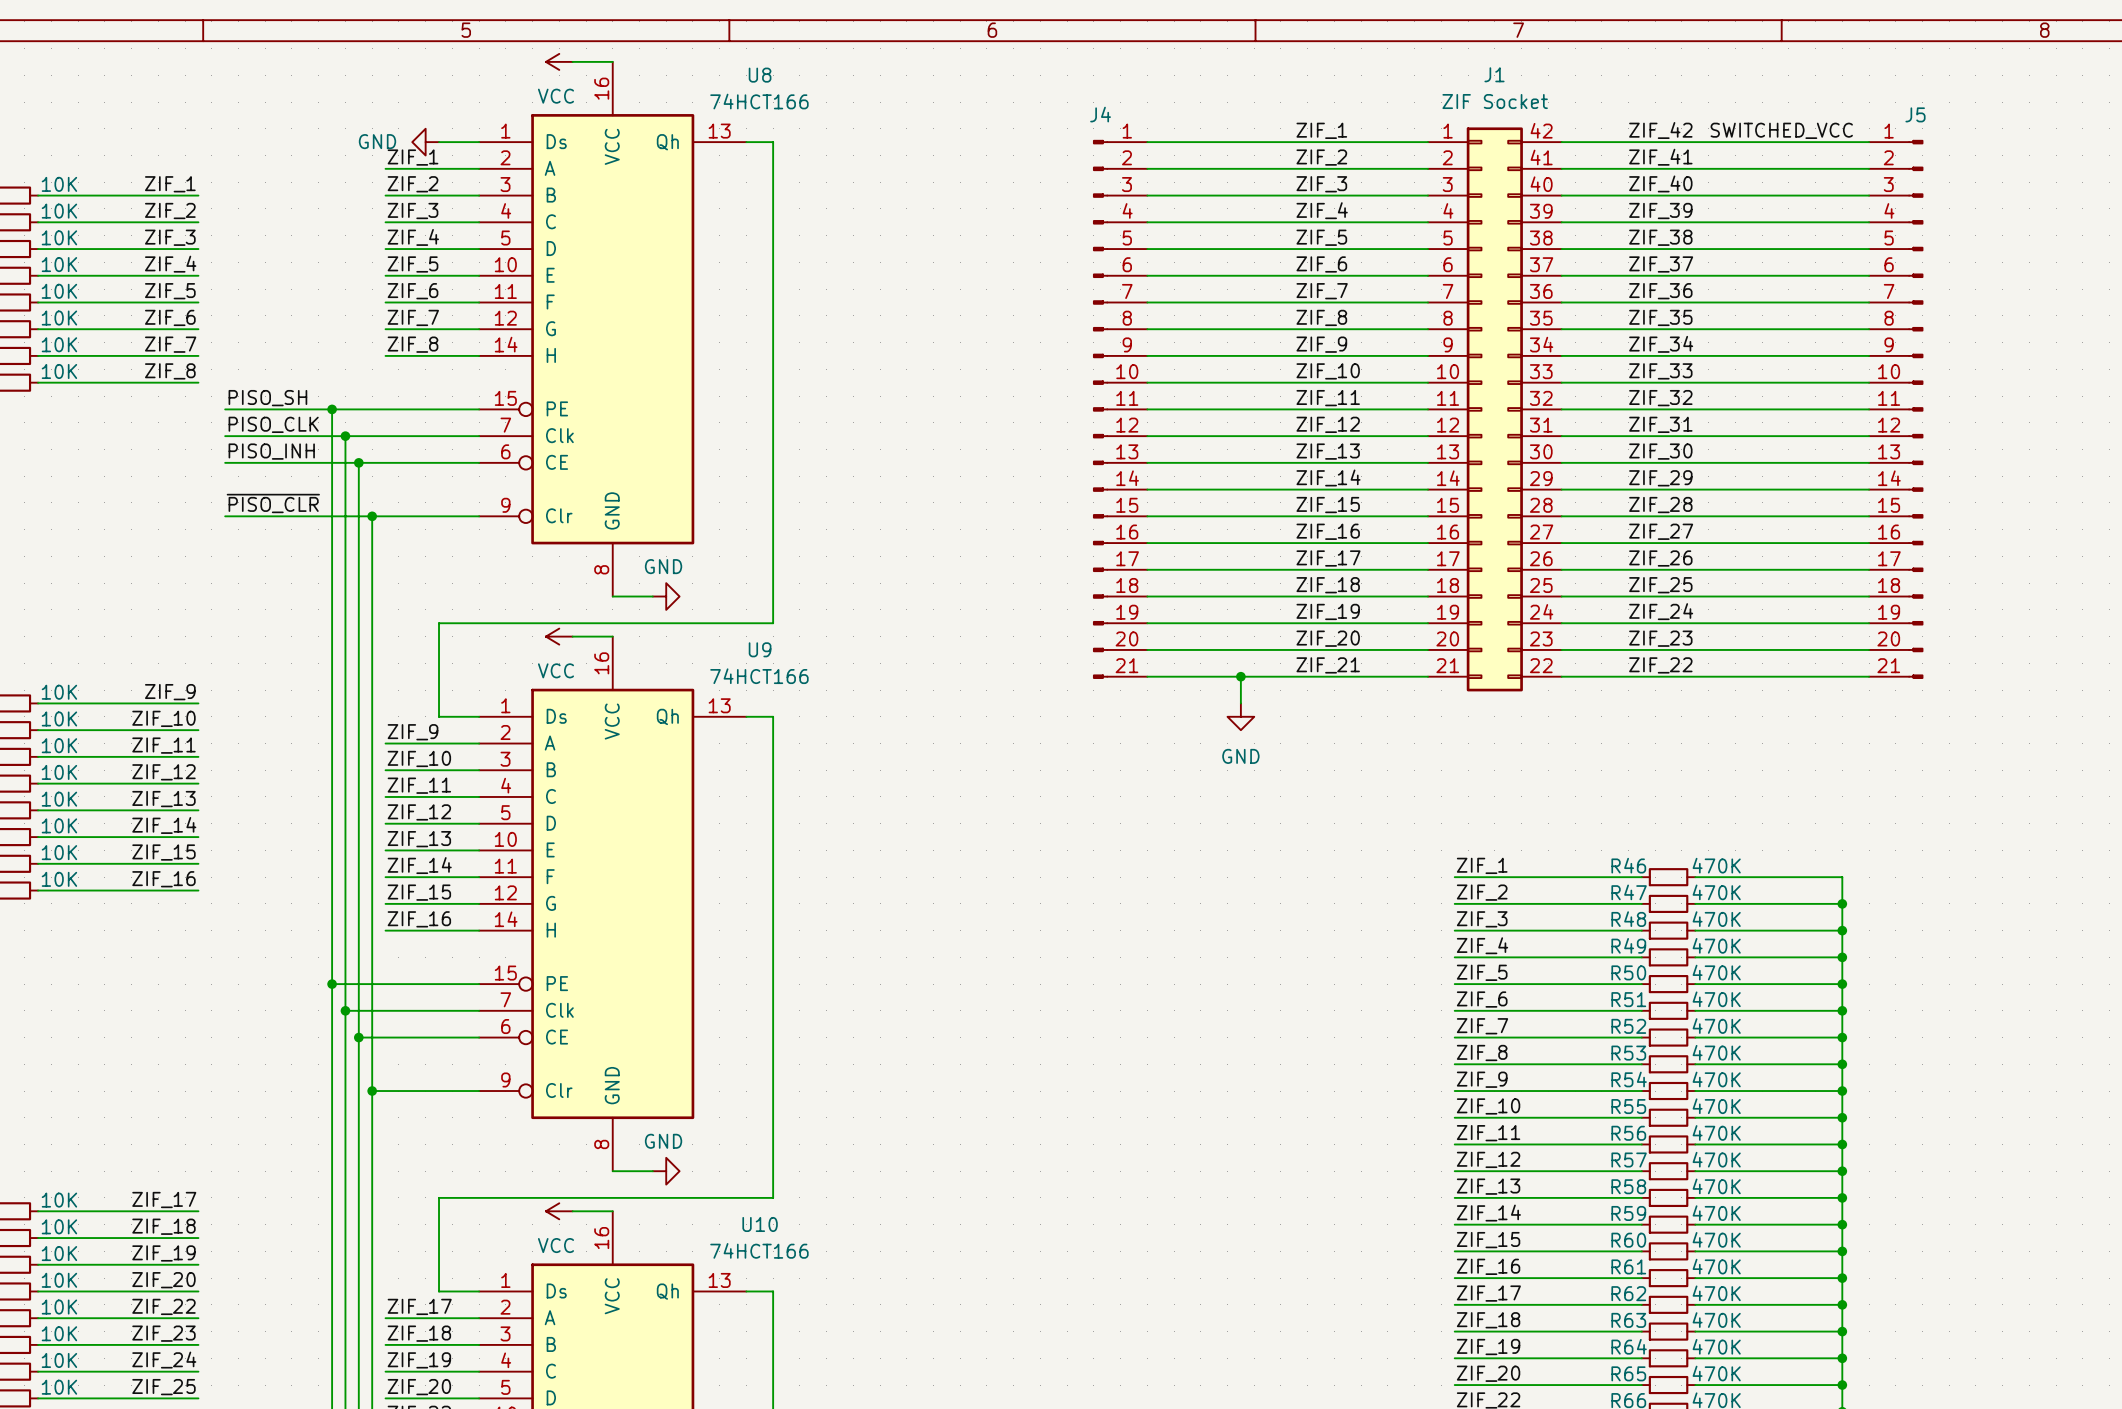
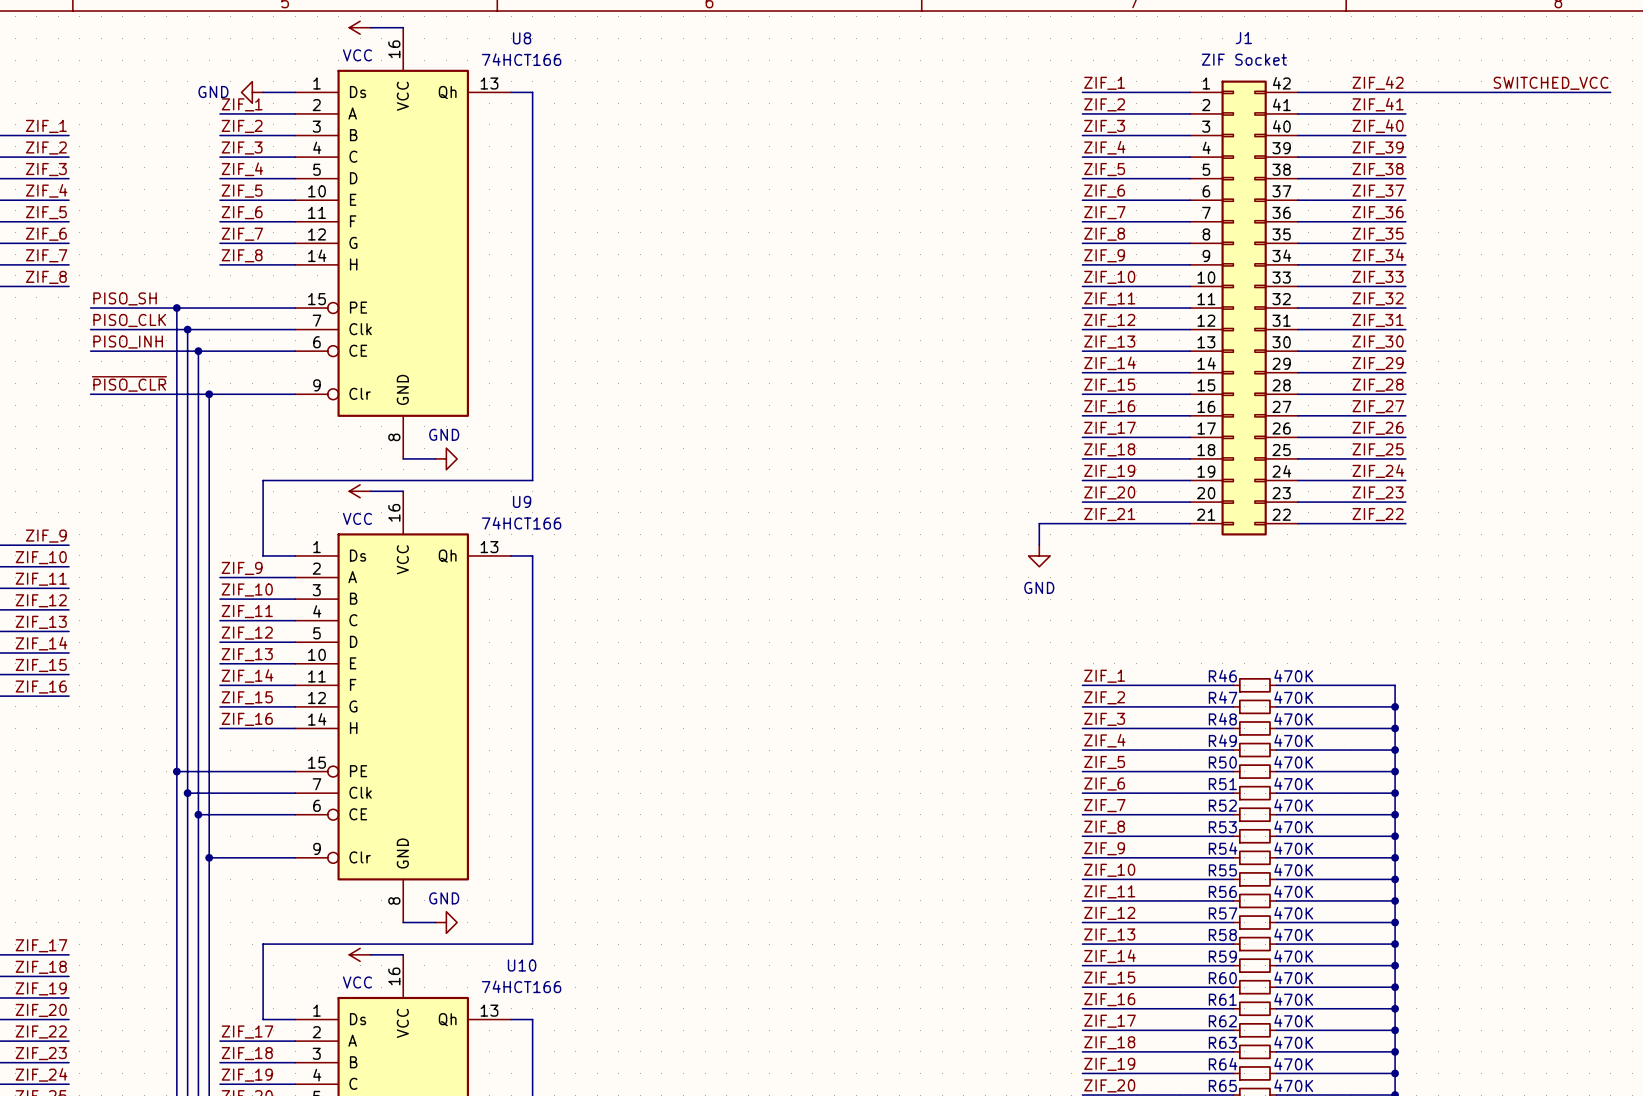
label position: ZIF_1 (1321, 130) -> ZIF_1 (1104, 83)
label: ZIF_42 (1660, 130) -> none
label: SWITCHED_VCC (1781, 130) -> ZIF_42 (1378, 83)
label: none -> SWITCHED_VCC (1551, 83)
wire: (1147, 142) (1428, 142) -> none
wire: none -> (1416, 92) (1610, 92)
label position: ZIF_2 (1321, 157) -> ZIF_2 (1104, 104)
label position: ZIF_41 (1660, 157) -> ZIF_41 (1378, 104)
wire: (1147, 168) (1428, 168) -> none
wire: (1855, 168) (1869, 168) -> none
label position: ZIF_40 (1660, 183) -> ZIF_40 (1378, 126)
label position: ZIF_3 (1321, 184) -> ZIF_3 (1104, 126)
wire: (1147, 195) (1428, 195) -> none
wire: (1855, 195) (1869, 195) -> none
label position: ZIF_4 (1322, 210) -> ZIF_4 (1104, 147)
label position: ZIF_39 (1660, 211) -> ZIF_39 (1378, 147)
wire: (1147, 222) (1428, 222) -> none
wire: (1855, 222) (1869, 222) -> none
label position: ZIF_5 (1321, 237) -> ZIF_5 (1104, 169)
label position: ZIF_38 (1660, 237) -> ZIF_38 (1378, 169)
wire: (1147, 249) (1428, 249) -> none
wire: (1855, 249) (1869, 249) -> none
label position: ZIF_6 (1321, 264) -> ZIF_6 (1104, 191)
label position: ZIF_37 (1661, 264) -> ZIF_37 (1378, 191)
wire: (1147, 275) (1428, 275) -> none
wire: (1855, 275) (1869, 275) -> none
label position: ZIF_7 (1322, 291) -> ZIF_7 (1104, 212)
label position: ZIF_36 (1660, 291) -> ZIF_36 (1378, 212)
wire: (1147, 302) (1428, 302) -> none
wire: (1855, 302) (1869, 302) -> none
label position: ZIF_8 (1321, 317) -> ZIF_8 (1104, 234)
label position: ZIF_35 (1660, 317) -> ZIF_35 (1378, 234)
wire: (1147, 329) (1428, 329) -> none
wire: (1855, 329) (1869, 329) -> none
label position: ZIF_9 (1321, 344) -> ZIF_9 (1104, 255)
label position: ZIF_34 (1661, 344) -> ZIF_34 (1378, 255)
wire: (1147, 355) (1428, 355) -> none
wire: (1855, 355) (1869, 355) -> none
label position: ZIF_10 (1328, 371) -> ZIF_10 (1109, 277)
label position: ZIF_33 (1660, 371) -> ZIF_33 (1378, 277)
wire: (1147, 382) (1428, 382) -> none
wire: (1855, 382) (1869, 382) -> none
label position: ZIF_11 (1328, 398) -> ZIF_11 (1109, 298)
label position: ZIF_32 (1660, 398) -> ZIF_32 (1378, 298)
J4: (1120, 409) -> none
wire: (1147, 409) (1428, 409) -> none
J1 position: (1494, 409) -> (1244, 308)
wire: (1855, 409) (1869, 409) -> none
J5: (1896, 409) -> none
label position: ZIF_12 (1328, 424) -> ZIF_12 (1109, 320)
label position: ZIF_31 (1660, 424) -> ZIF_31 (1378, 320)
wire: (1147, 436) (1428, 436) -> none
wire: (1855, 436) (1869, 436) -> none
label position: ZIF_13 (1328, 451) -> ZIF_13 (1109, 342)
label position: ZIF_30 (1660, 451) -> ZIF_30 (1378, 342)
wire: (1147, 462) (1428, 462) -> none
wire: (1855, 462) (1869, 462) -> none
label position: ZIF_14 (1328, 477) -> ZIF_14 (1109, 363)
label position: ZIF_29 (1660, 478) -> ZIF_29 (1378, 363)
wire: (1147, 489) (1428, 489) -> none
wire: (1855, 489) (1869, 489) -> none
label position: ZIF_15 (1328, 505) -> ZIF_15 (1109, 385)
label position: ZIF_28 (1660, 505) -> ZIF_28 (1378, 385)
wire: (1147, 516) (1428, 516) -> none
wire: (1855, 516) (1869, 516) -> none
label position: ZIF_16 (1328, 531) -> ZIF_16 (1109, 406)
label position: ZIF_27 (1661, 531) -> ZIF_27 (1378, 406)
wire: (1147, 543) (1428, 543) -> none
wire: (1855, 543) (1869, 543) -> none
label position: ZIF_17 (1328, 558) -> ZIF_17 (1109, 428)
label position: ZIF_26 (1660, 558) -> ZIF_26 (1378, 428)
wire: (1147, 569) (1428, 569) -> none
wire: (1855, 569) (1869, 569) -> none
label position: ZIF_18 (1328, 585) -> ZIF_18 (1109, 449)
label position: ZIF_25 (1660, 585) -> ZIF_25 (1378, 449)
wire: (1147, 596) (1428, 596) -> none
wire: (1855, 596) (1869, 596) -> none
label position: ZIF_19 (1328, 611) -> ZIF_19 (1109, 471)
label position: ZIF_24 (1661, 611) -> ZIF_24 (1378, 471)
wire: (1147, 623) (1428, 623) -> none
wire: (1855, 623) (1869, 623) -> none
label position: ZIF_20 (1328, 638) -> ZIF_20 (1109, 492)
label position: ZIF_23 (1660, 638) -> ZIF_23 (1378, 492)
wire: (1147, 649) (1428, 649) -> none
wire: (1855, 649) (1869, 649) -> none
label position: ZIF_21 (1328, 665) -> ZIF_21 (1109, 514)
label position: ZIF_22 (1660, 665) -> ZIF_22 (1378, 514)
wire: (1147, 676) (1401, 676) -> (1039, 545) (1039, 523)
wire: (1240, 676) (1240, 703) -> none
junction: (1240, 676) -> none
wire: (1855, 676) (1869, 676) -> none
power symbol position: GND (1240, 716) -> GND (1039, 555)

